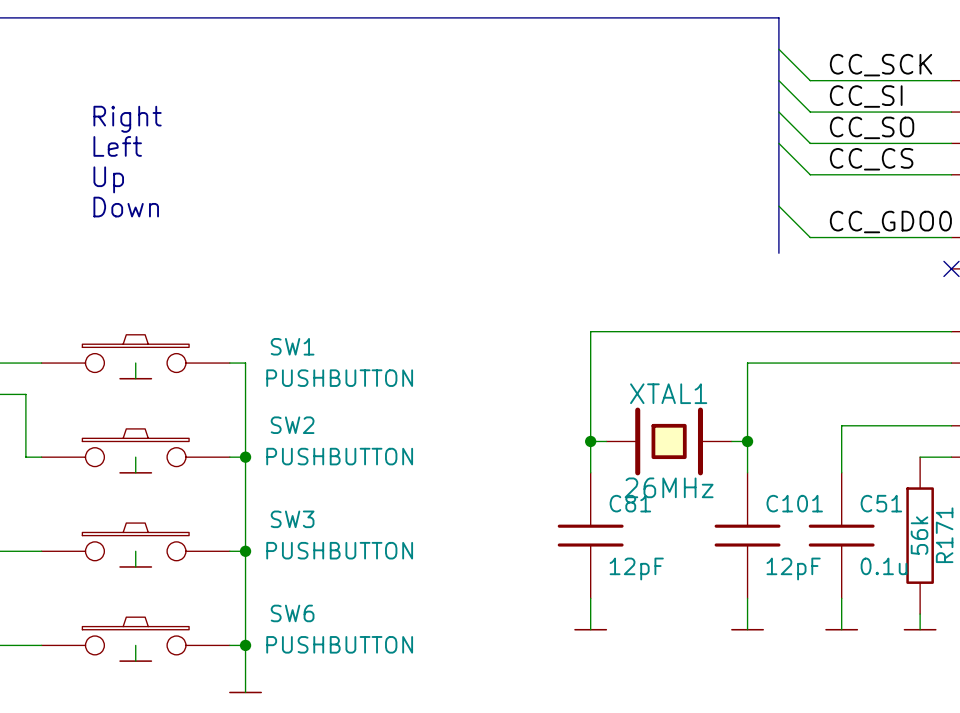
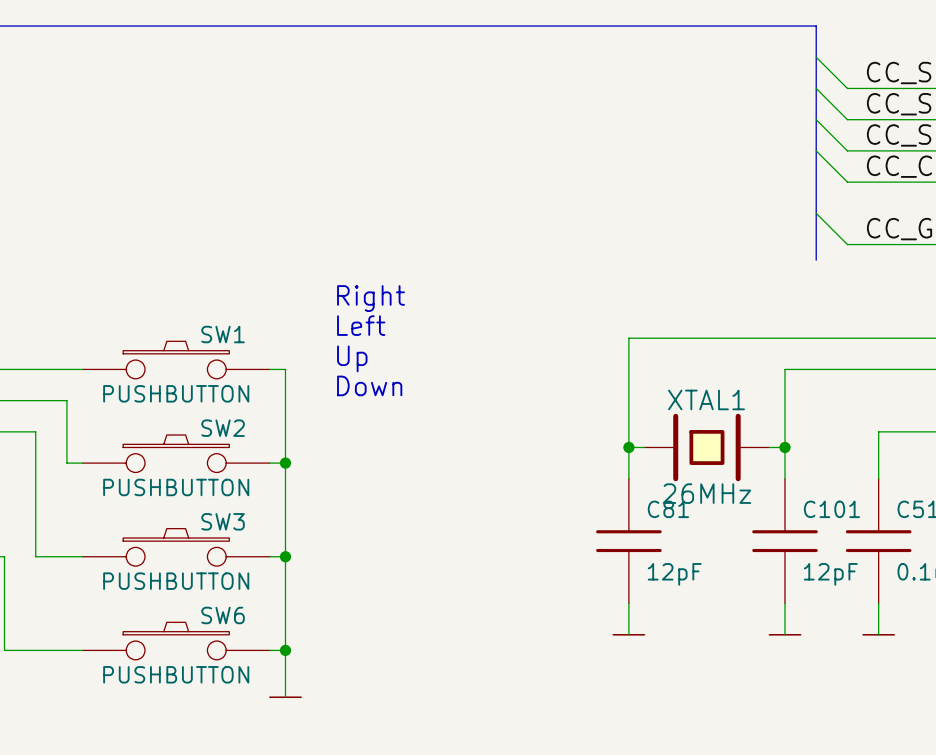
text position: Right (127, 119) -> Right (371, 298)
text position: Left (117, 146) -> Left (361, 325)
text position: Up (108, 179) -> Up (352, 358)
text position: Down (126, 207) -> Down (369, 385)
SW1 name position: SW1 (292, 346) -> SW1 (223, 334)
wire: (135, 363) (135, 378) -> none
power symbol: (135, 378) -> none
SW1 value position: PUSHBUTTON (339, 378) -> PUSHBUTTON (176, 393)
SW2 name position: SW2 (292, 425) -> SW2 (223, 428)
SW2 value position: PUSHBUTTON (339, 456) -> PUSHBUTTON (176, 487)
wire: (135, 457) (135, 472) -> none
power symbol: (135, 472) -> none
SW3 name position: SW3 (292, 519) -> SW3 (223, 521)
SW3 value position: PUSHBUTTON (339, 550) -> PUSHBUTTON (176, 581)
wire: (135, 551) (135, 566) -> none
power symbol: (135, 566) -> none
SW6 name position: SW6 (292, 613) -> SW6 (223, 615)
SW6 value position: PUSHBUTTON (339, 644) -> PUSHBUTTON (176, 674)
wire: (135, 645) (135, 661) -> none
power symbol: (135, 661) -> none

